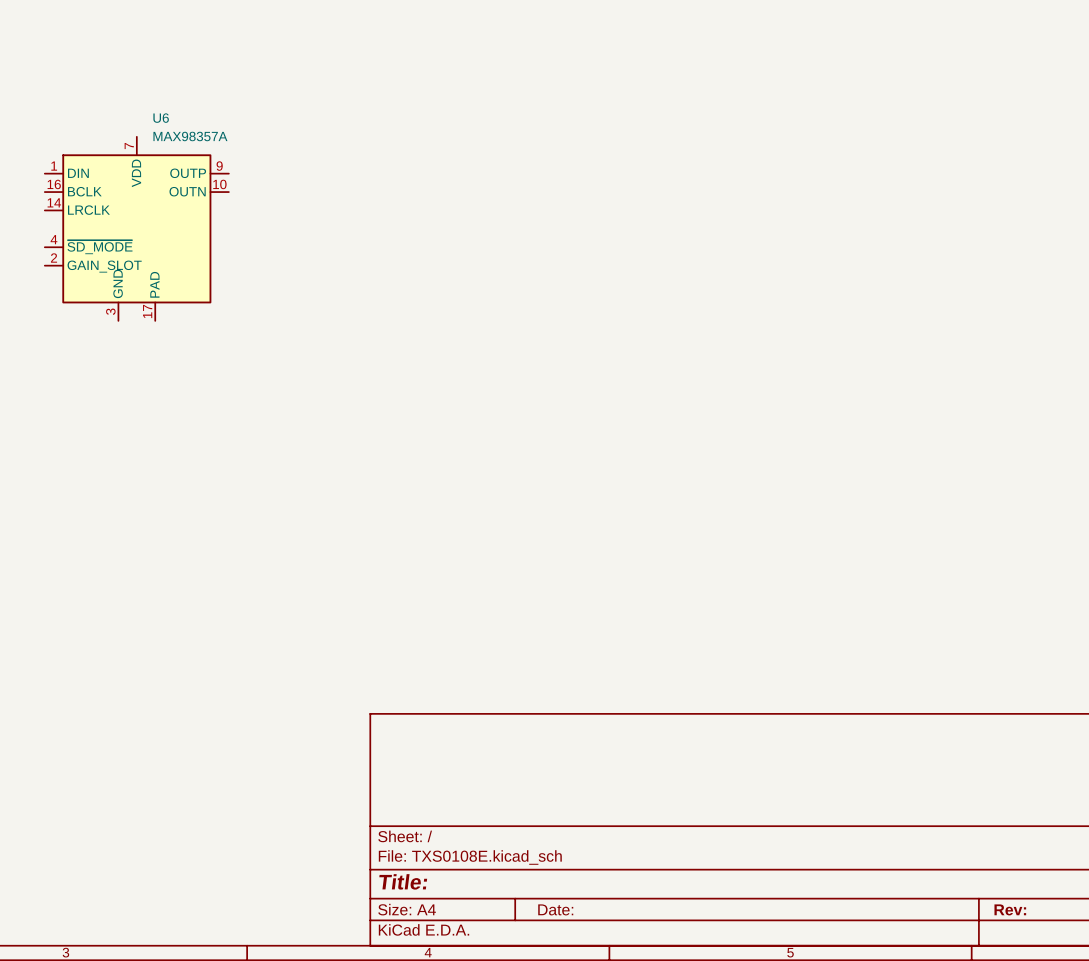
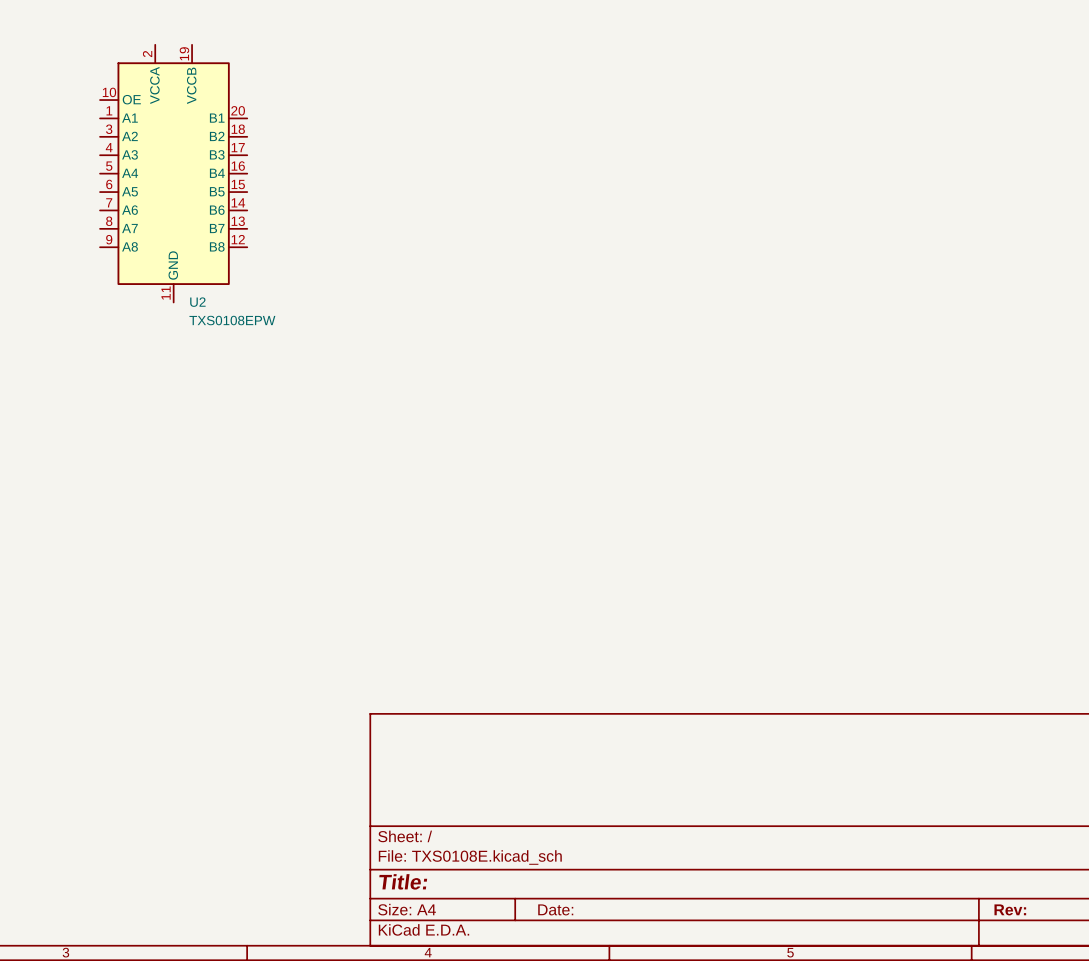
U2: none -> TXS0108EPW (173, 173)
U6: MAX98357A (136, 228) -> none

